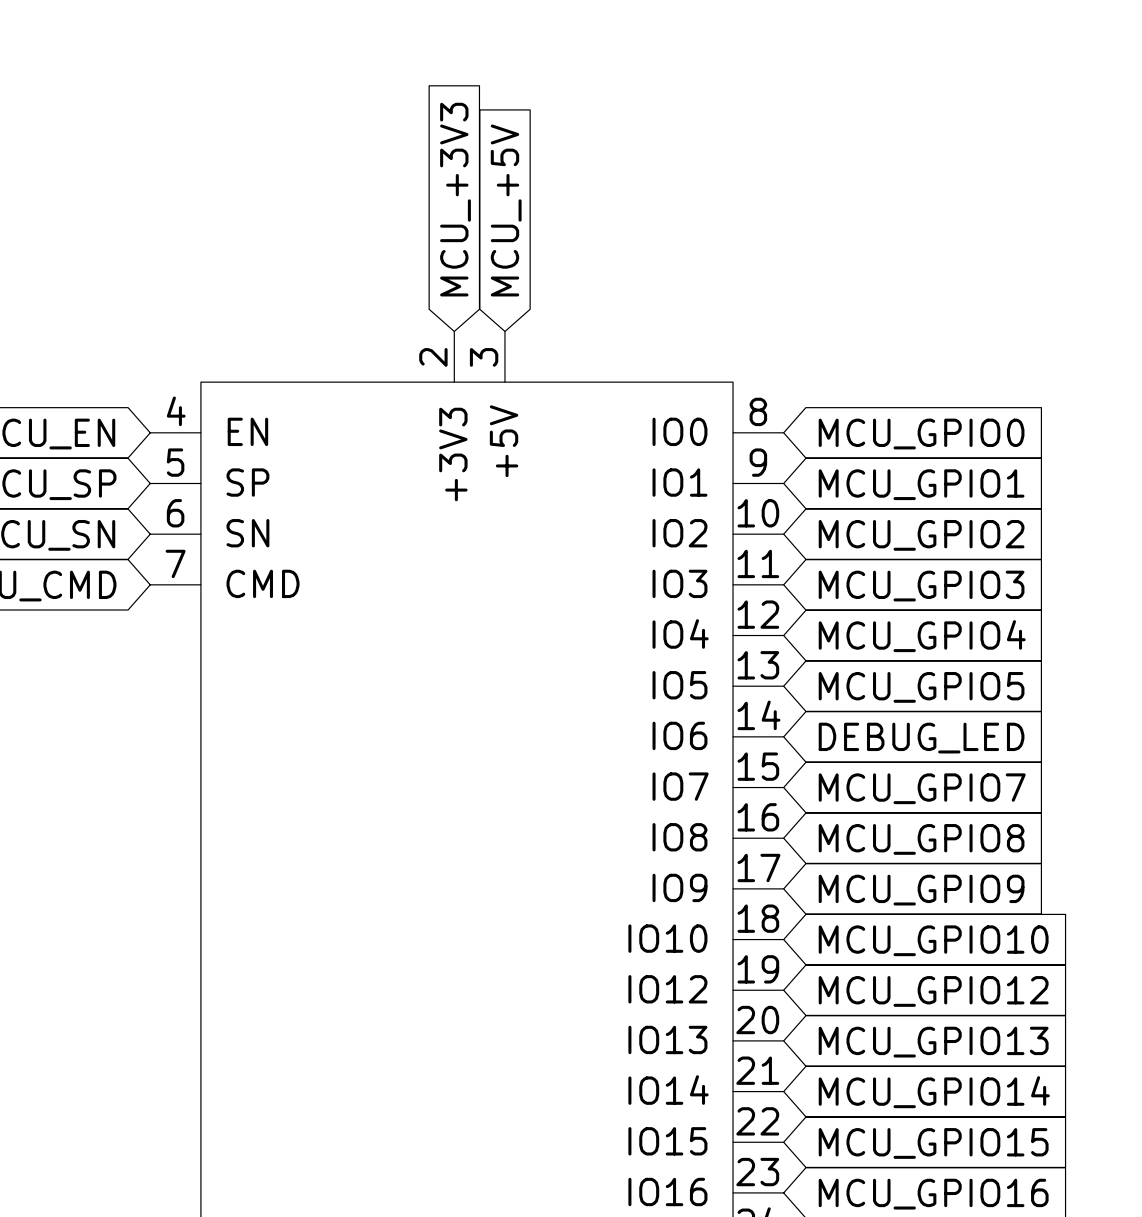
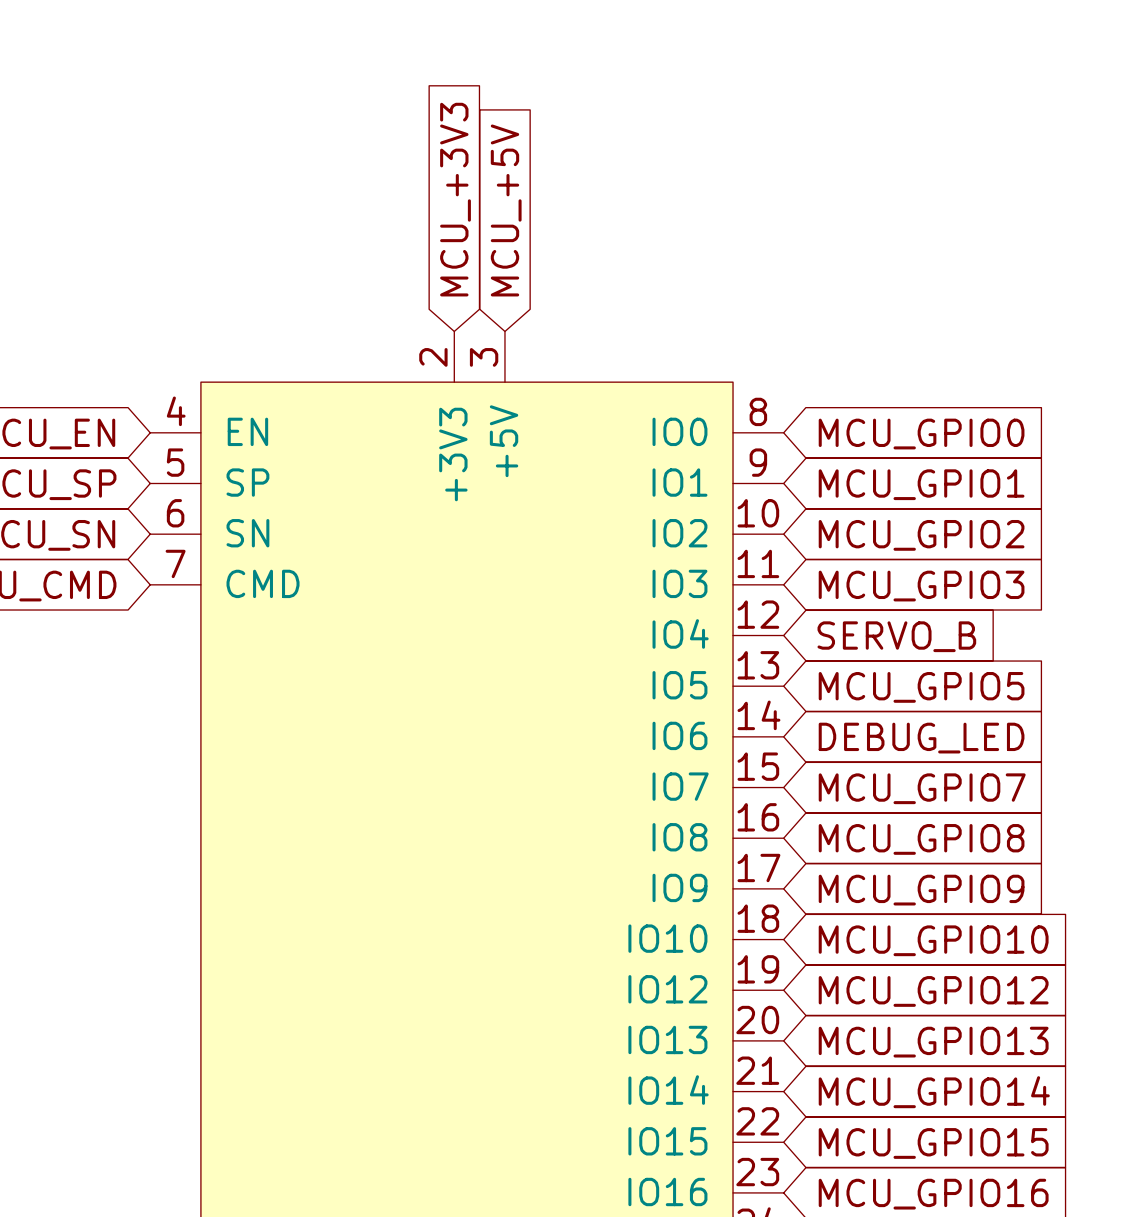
global label: MCU_GPIO4 (922, 636) -> SERVO_B (896, 636)

